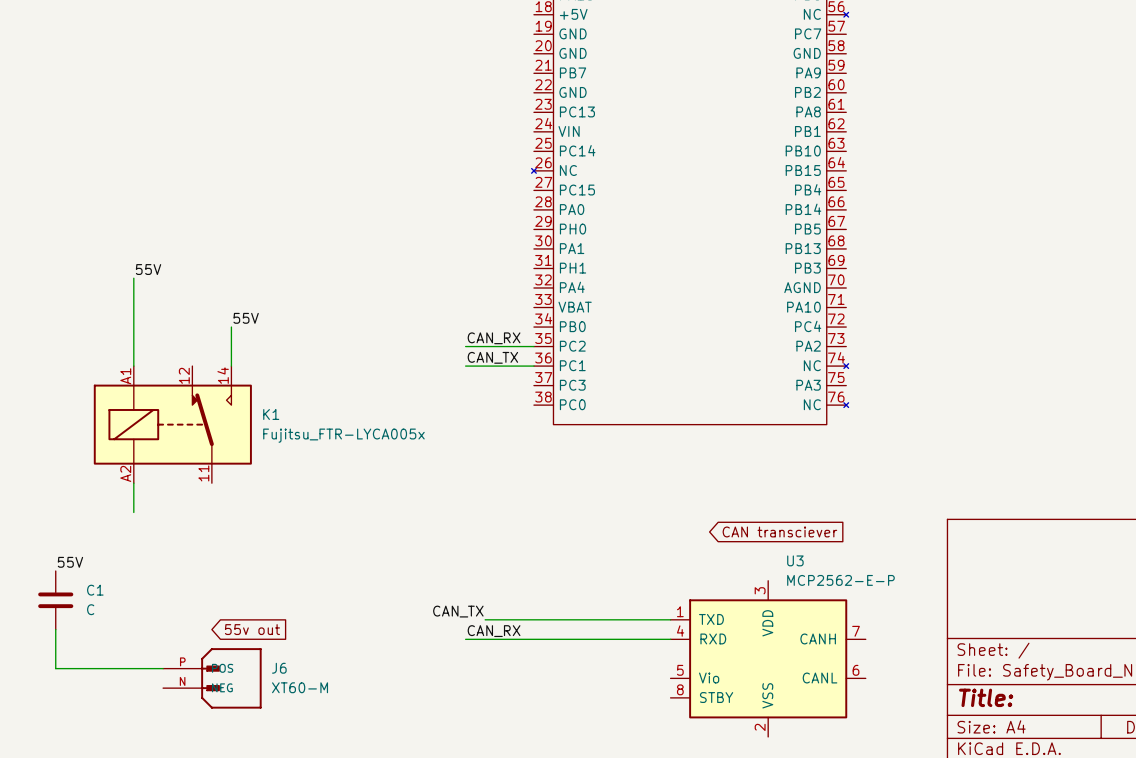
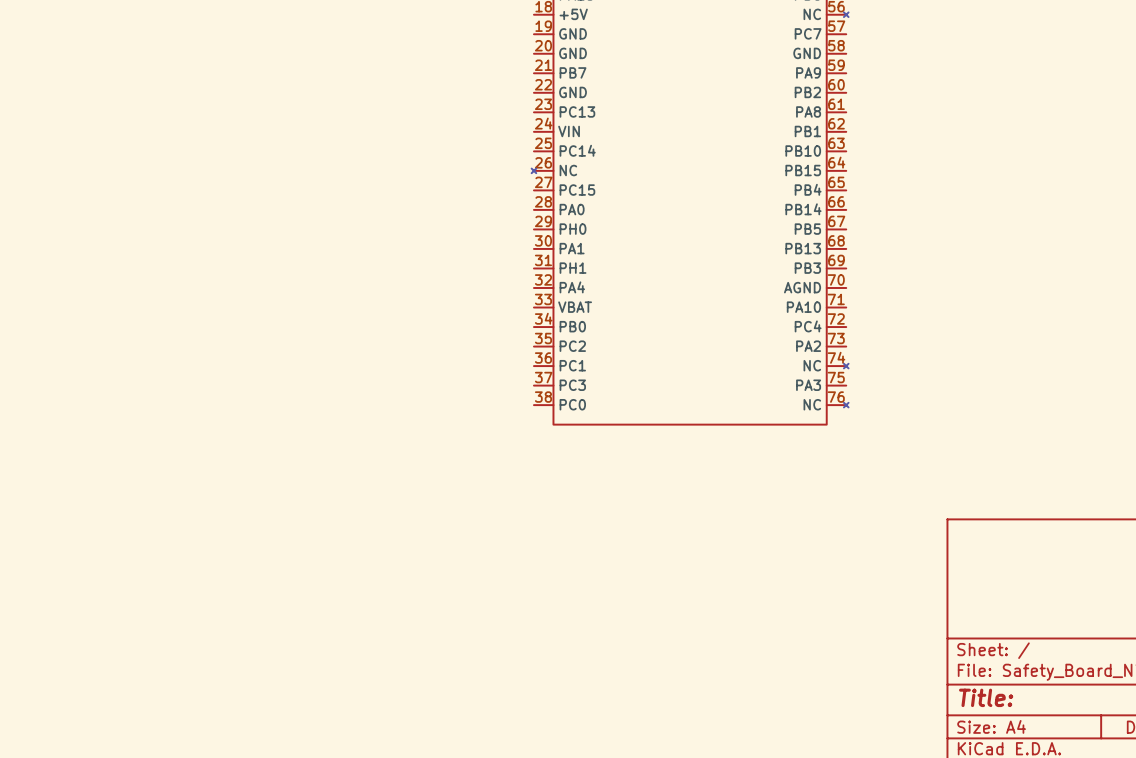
label: 55V (148, 269) -> none
wire: (133, 278) (133, 366) -> none
label: 55V (246, 318) -> none
wire: (231, 327) (231, 366) -> none
label: CAN_RX (494, 338) -> none
wire: (465, 346) (533, 346) -> none
label: CAN_TX (492, 357) -> none
wire: (465, 366) (533, 366) -> none
K1: Fujitsu_FTR-LYCA005x (172, 424) -> none
wire: (133, 483) (133, 512) -> none
global label: CAN transciever (779, 531) -> none
label: 55V (70, 562) -> none
C1: C (55, 600) -> none
label: CAN_TX (458, 611) -> none
wire: (485, 619) (670, 619) -> none
wire: (55, 629) (55, 668) (163, 668) -> none
global label: 55v out (252, 629) -> none
label: CAN_RX (494, 631) -> none
wire: (465, 639) (670, 639) -> none
U3: MCP2562-E-P (768, 658) -> none
J6: XT60-M (212, 678) -> none

